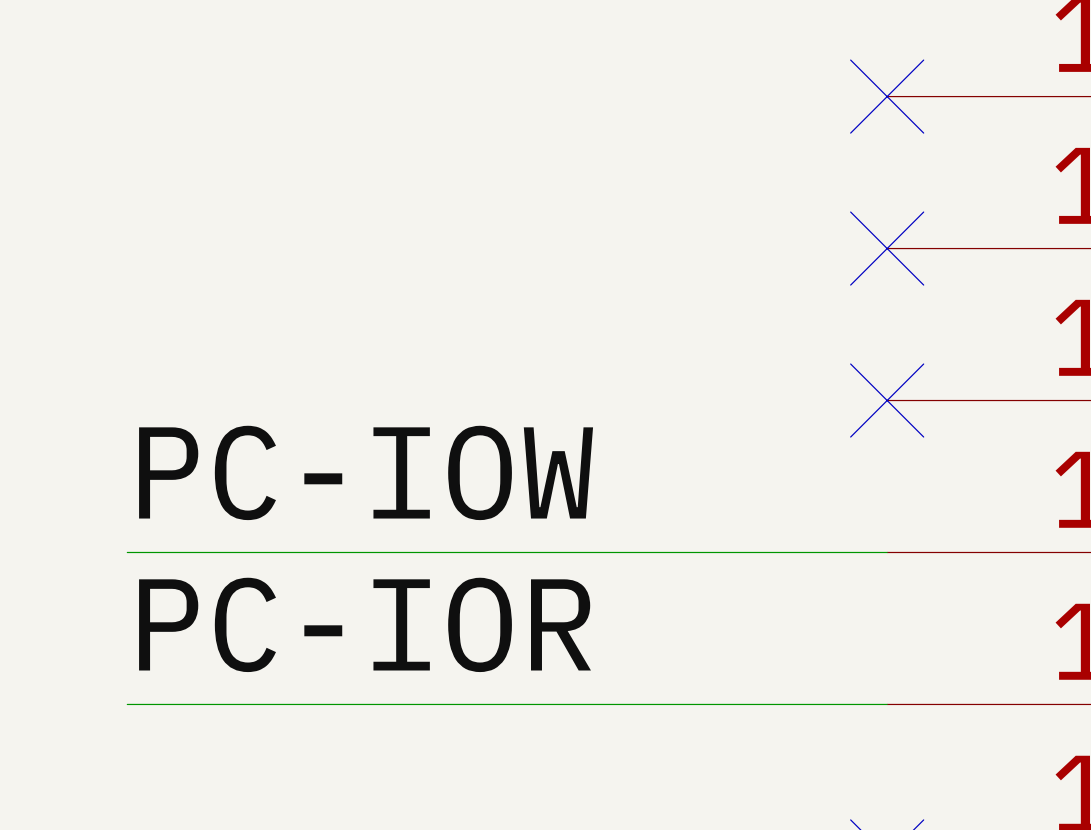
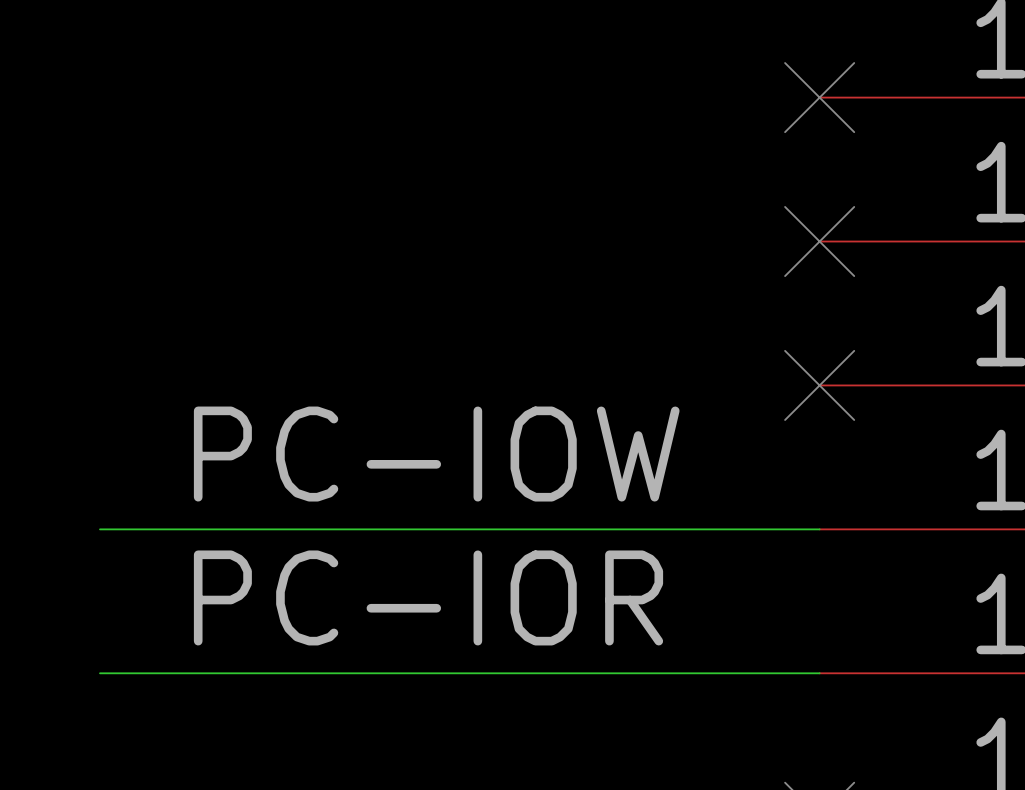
label position: PC-IOW (366, 472) -> PC-IOW (436, 454)
label position: PC-IOR (365, 624) -> PC-IOR (428, 597)

